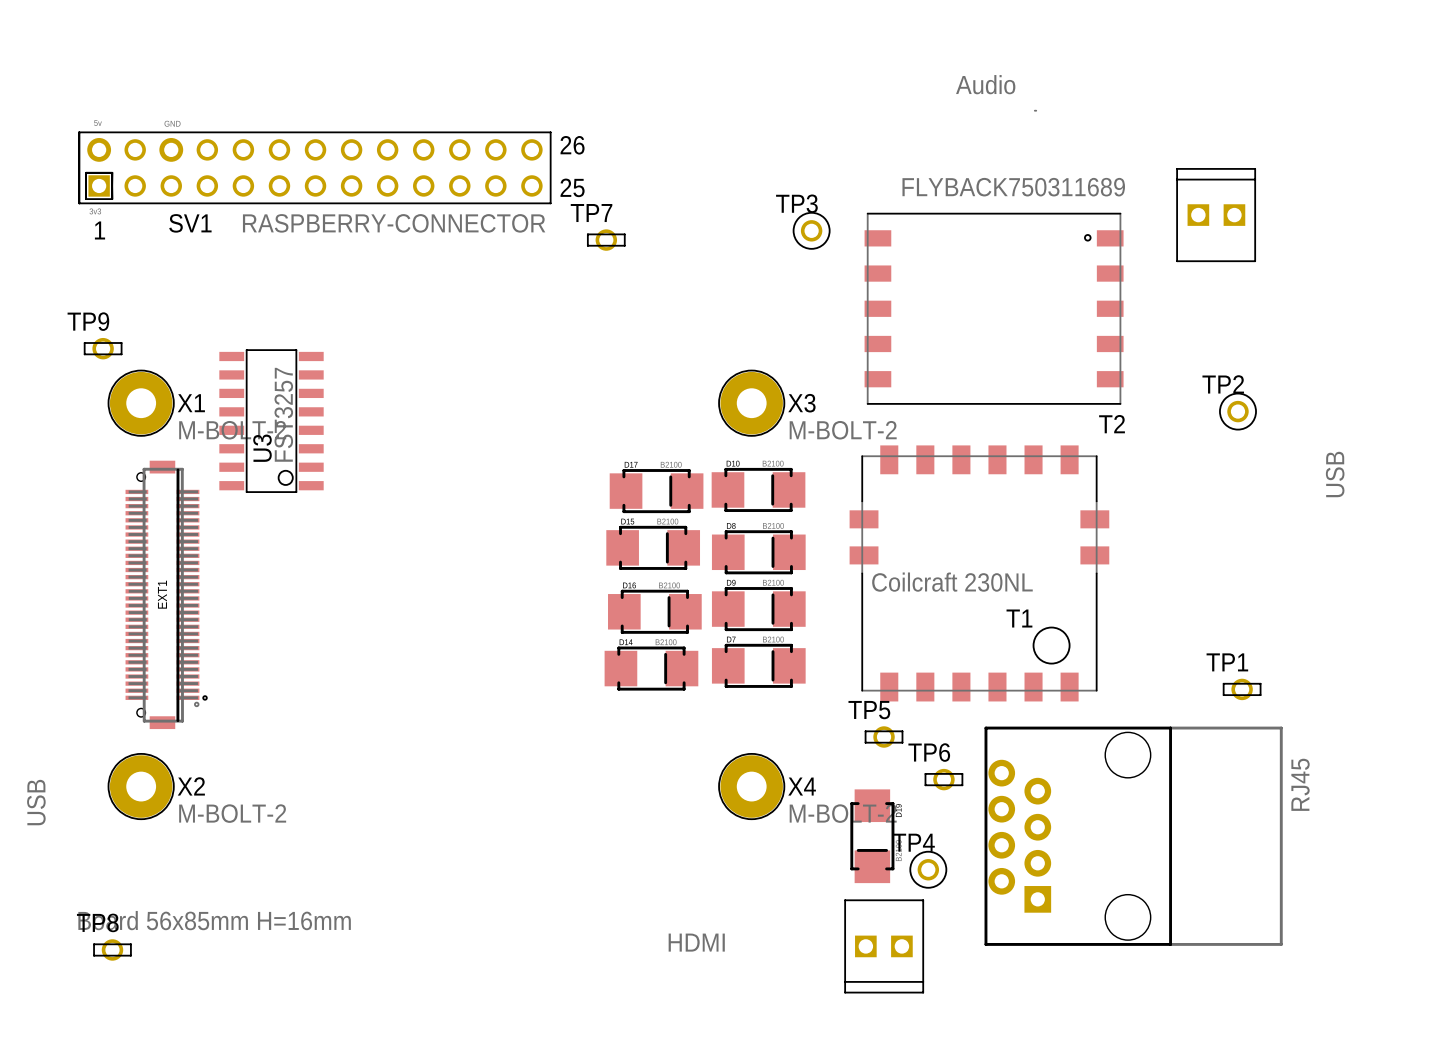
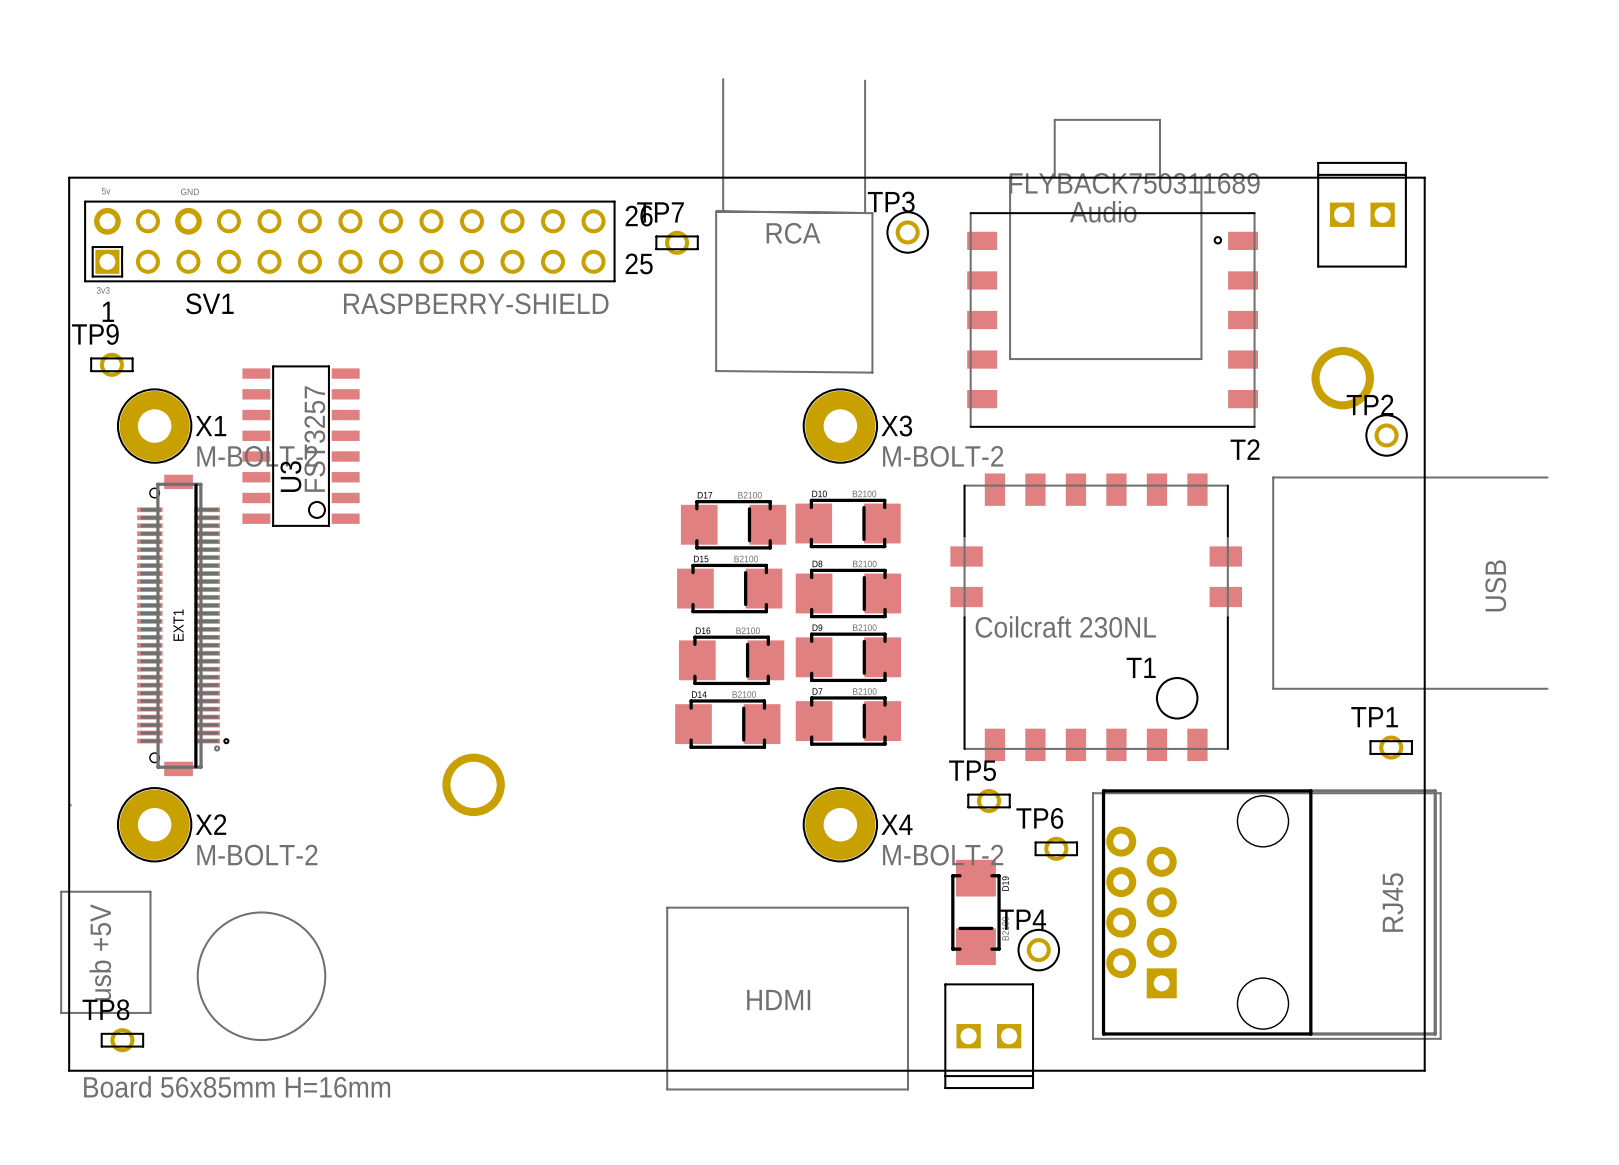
drawing: [78, 109, 1038, 205] -> none
SV1 footprint: [78, 131, 552, 205] -> [60, 78, 1549, 1091]
SV1 name position: SV1 (190, 223) -> SV1 (209, 303)
SV1 value: RASPBERRY-CONNECTOR (394, 223) -> RASPBERRY-SHIELD (476, 303)
EXT1 position: (166, 594) -> (183, 625)
X2 position: (141, 786) -> (154, 824)
X4 position: (751, 786) -> (840, 824)

